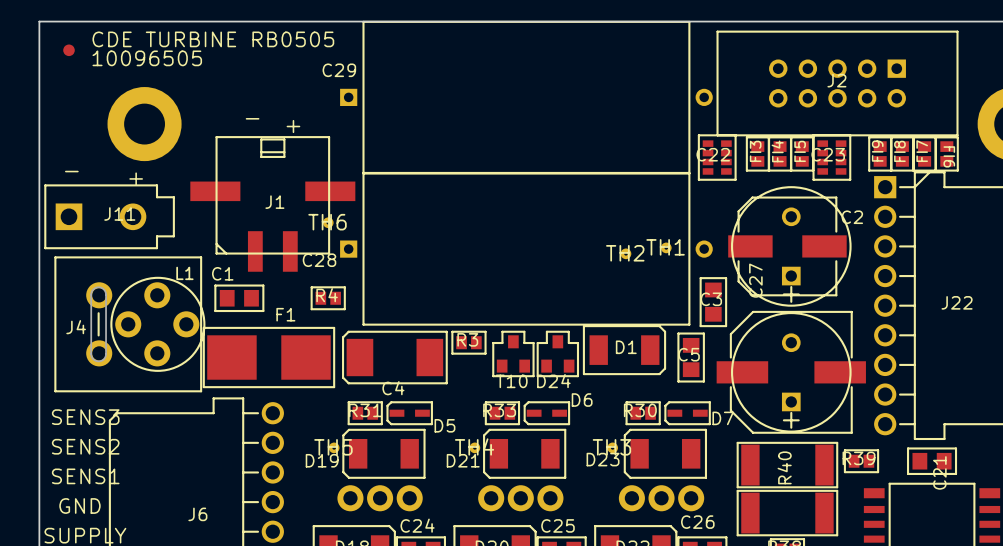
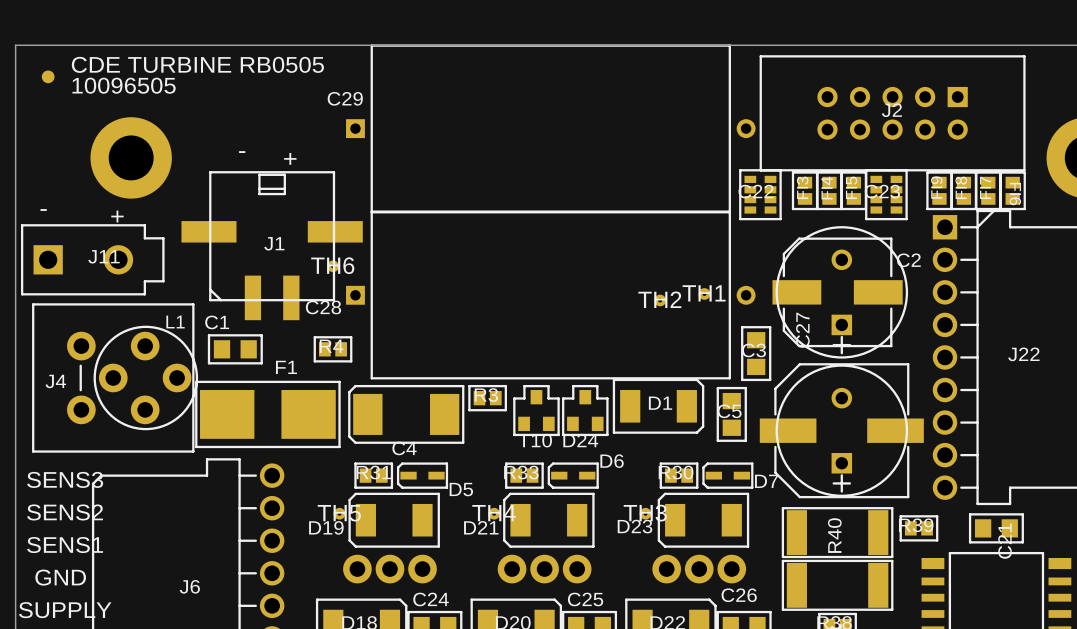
J4 footprint: [90, 286, 107, 362] -> [79, 364, 82, 392]

